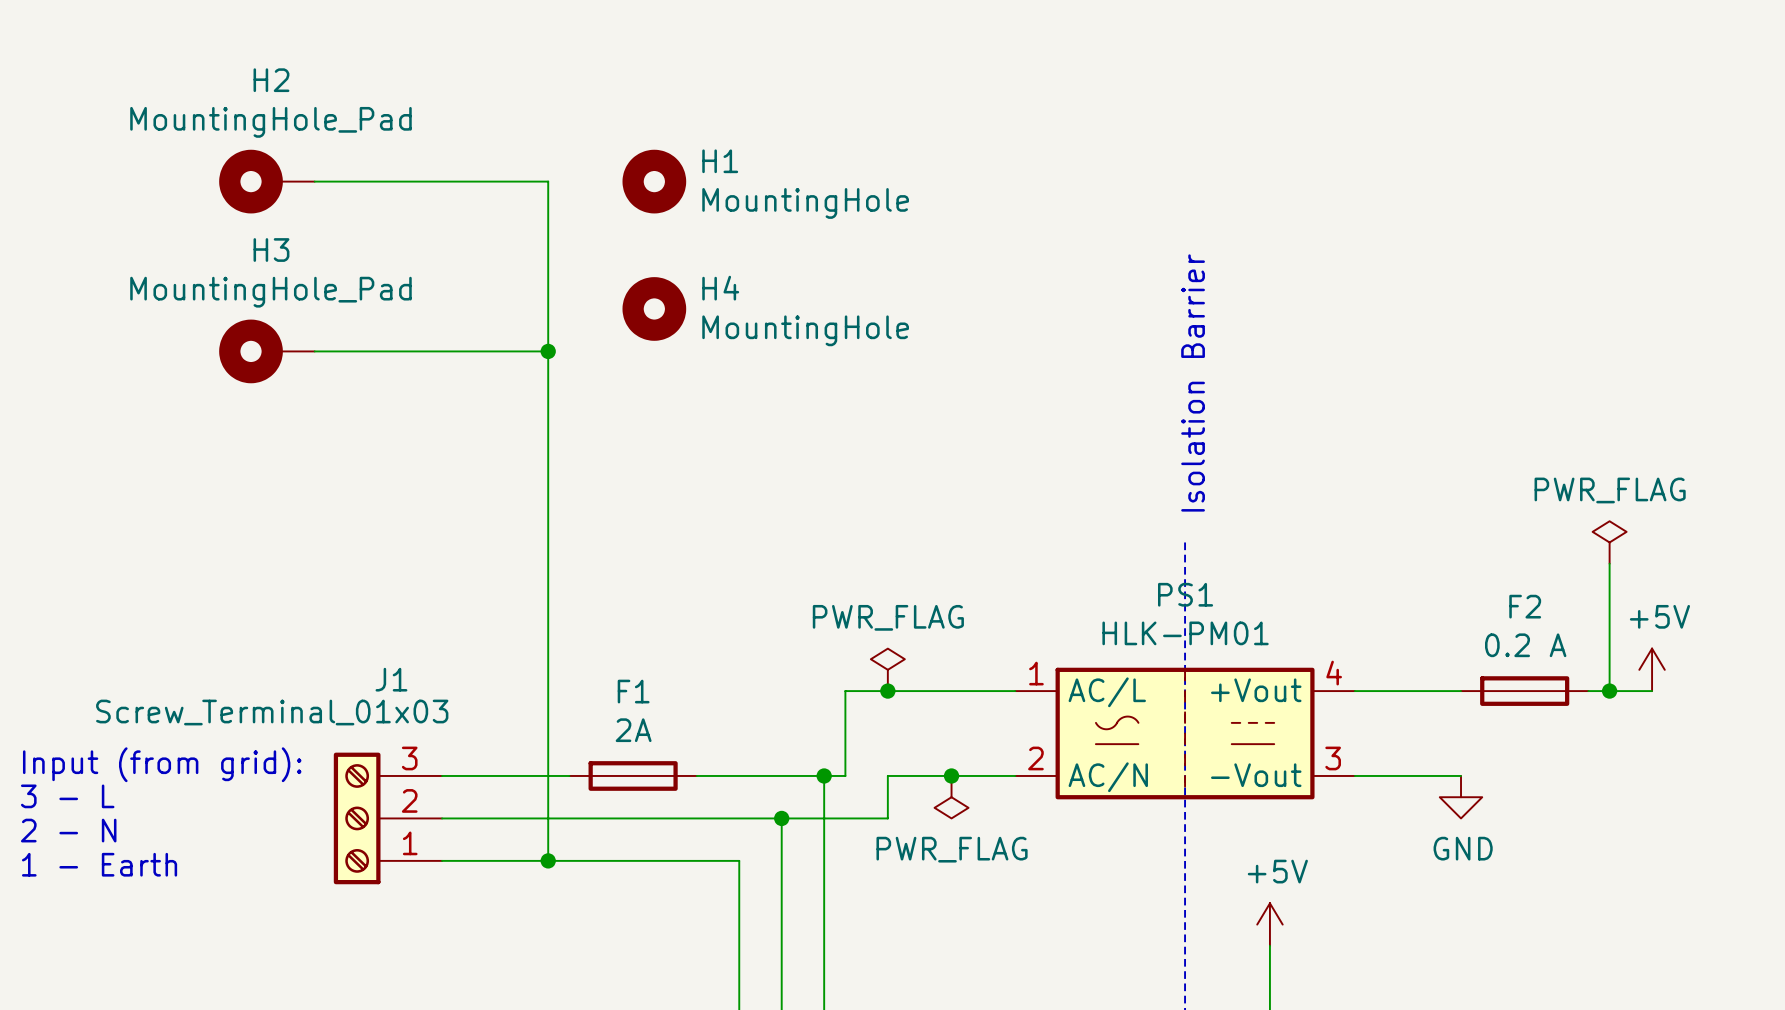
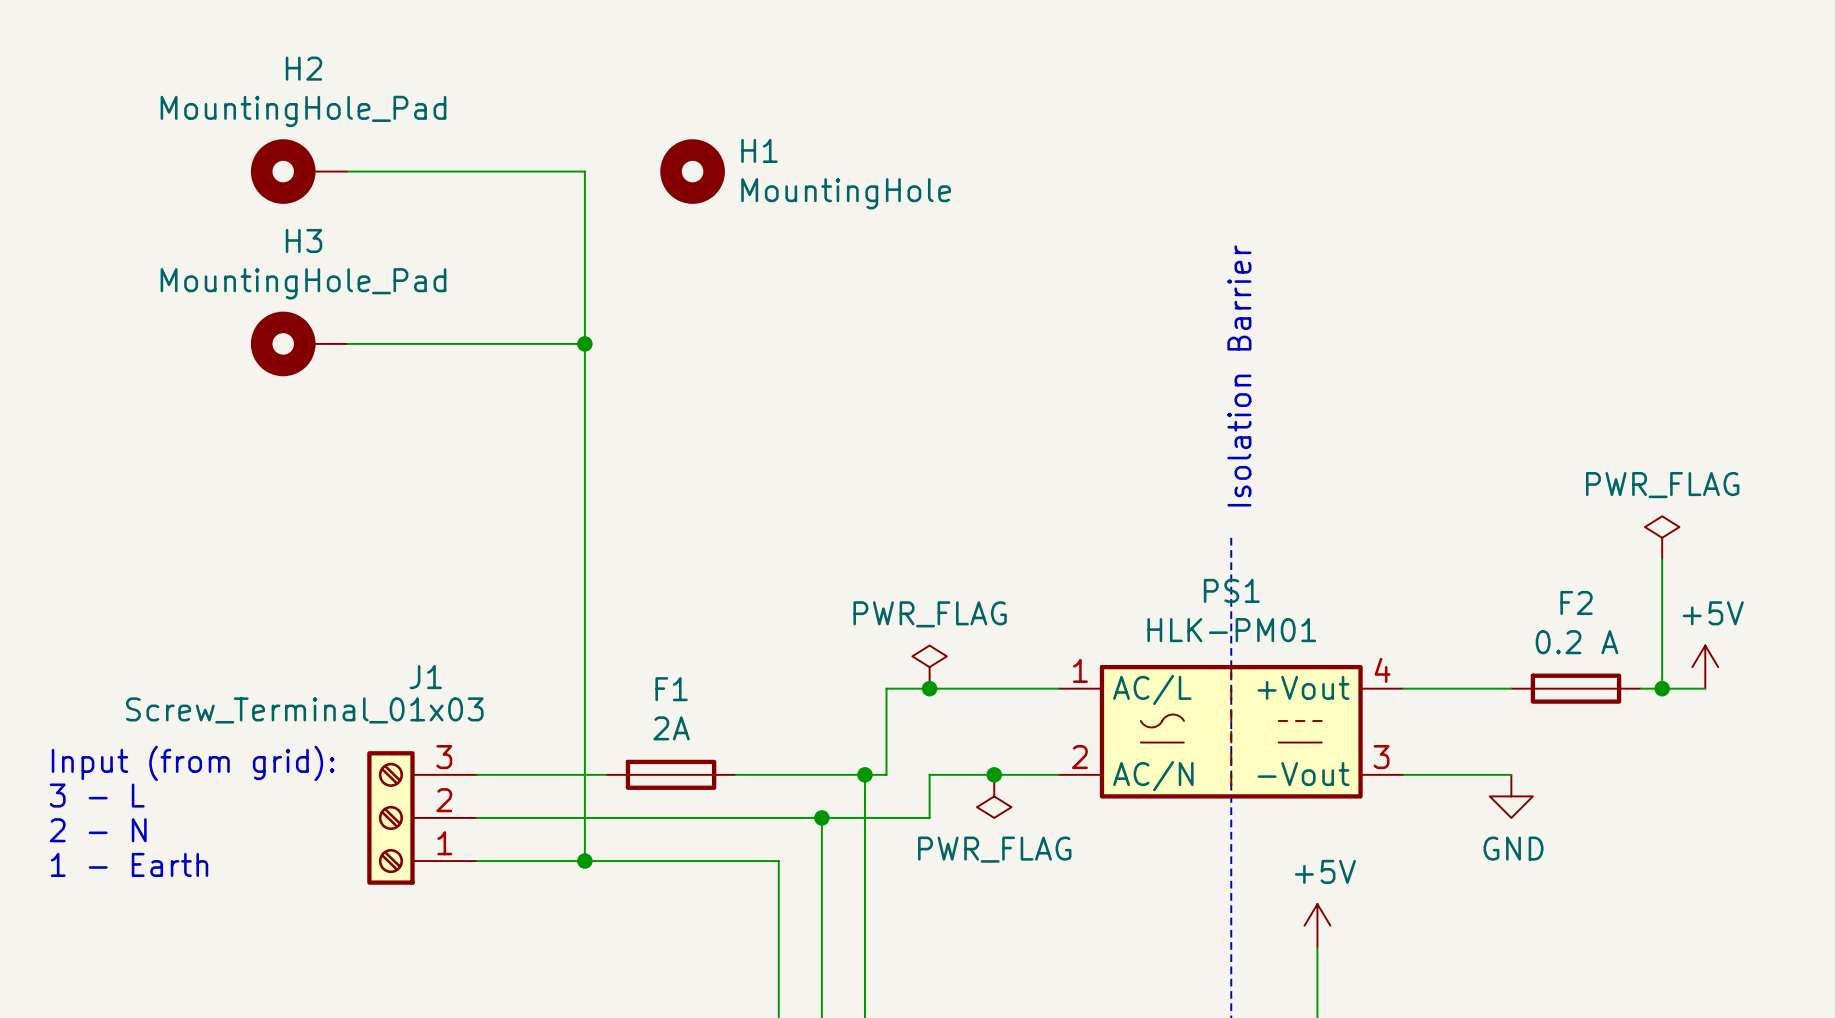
H4: MountingHole (654, 308) -> none

